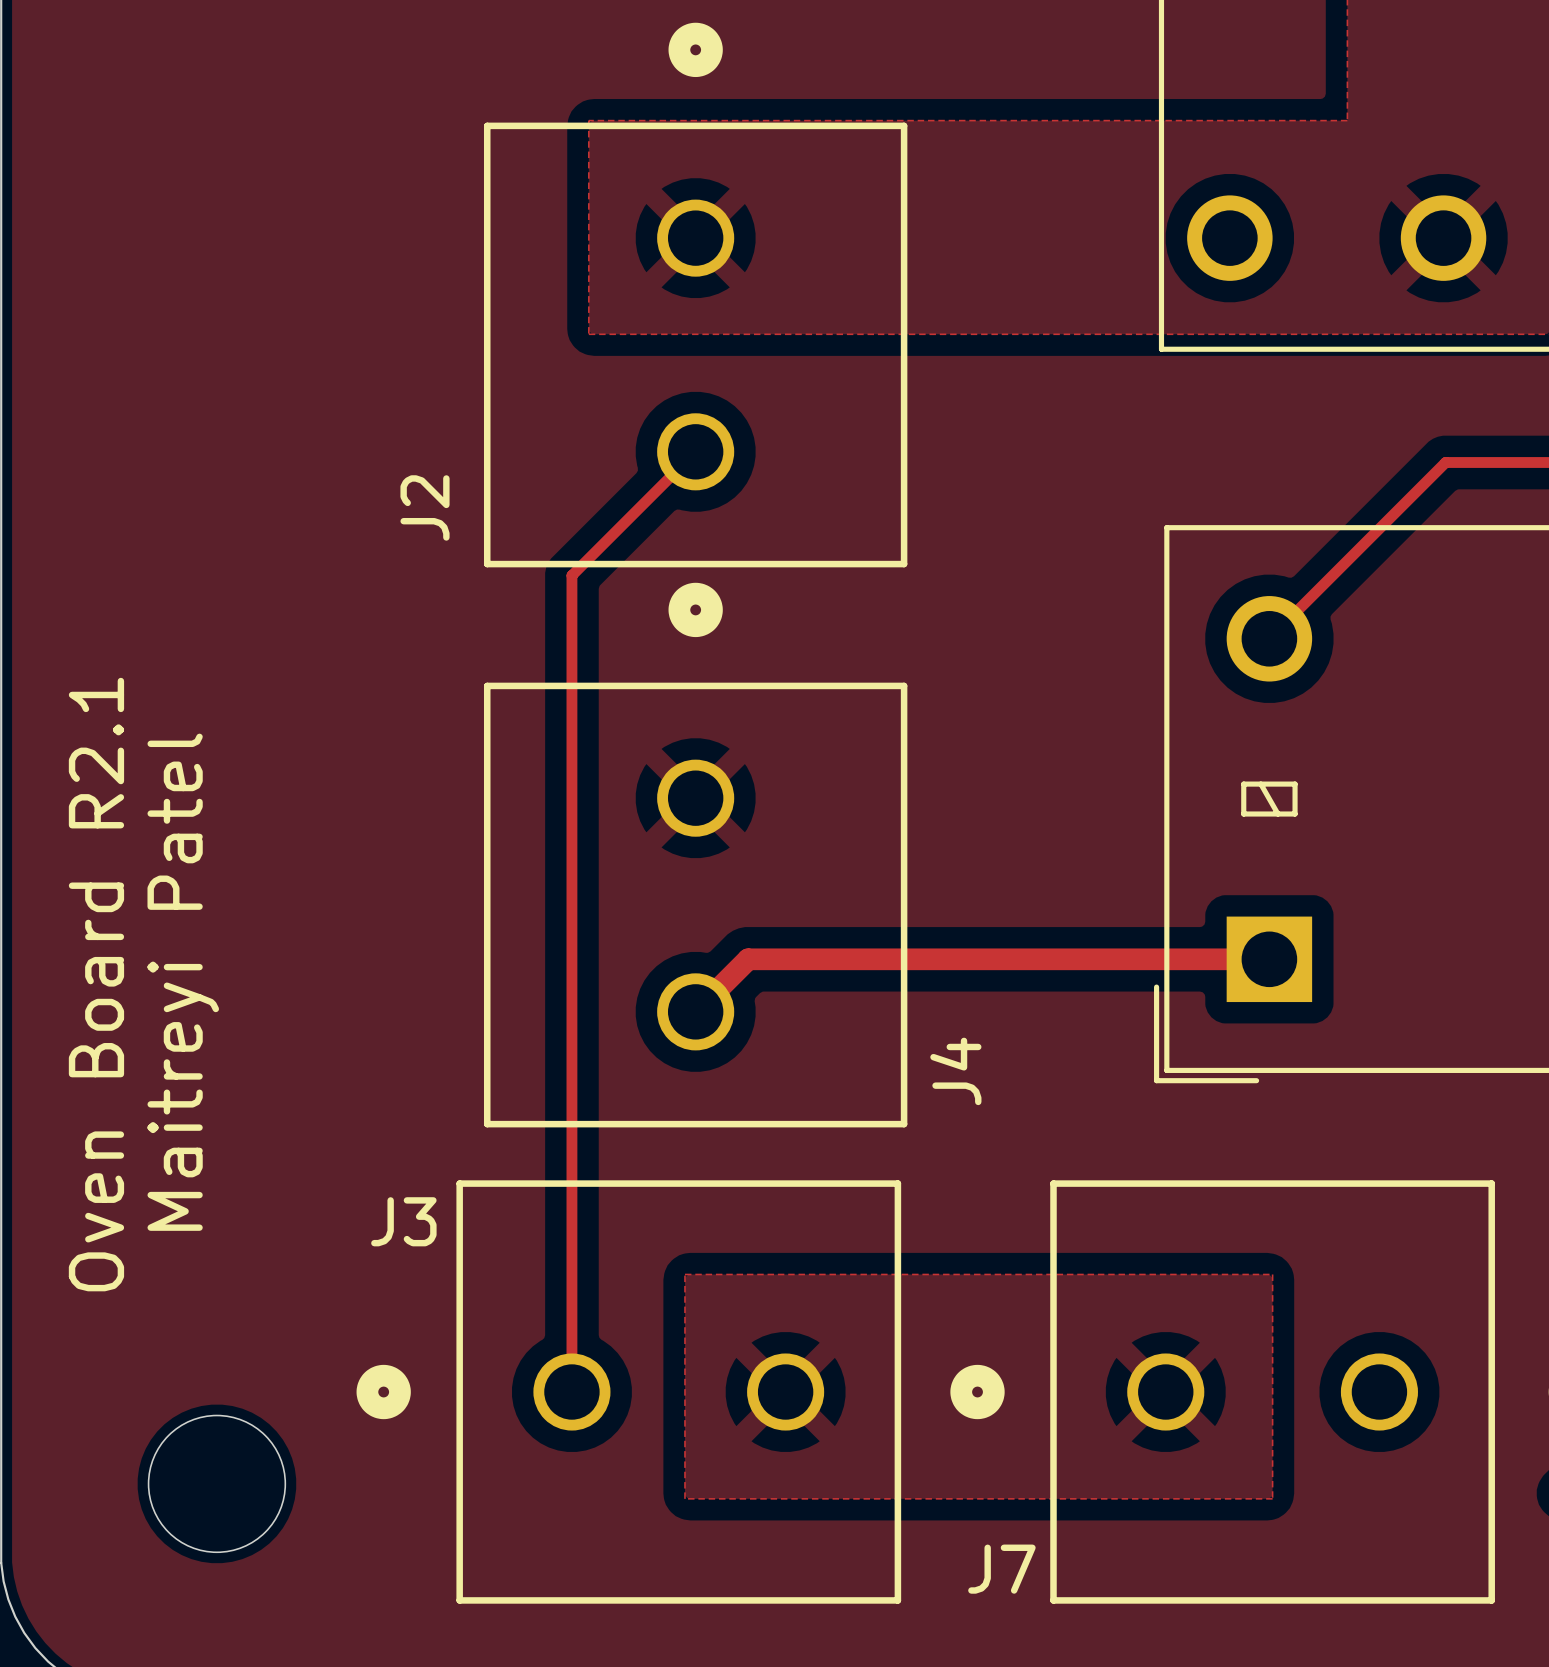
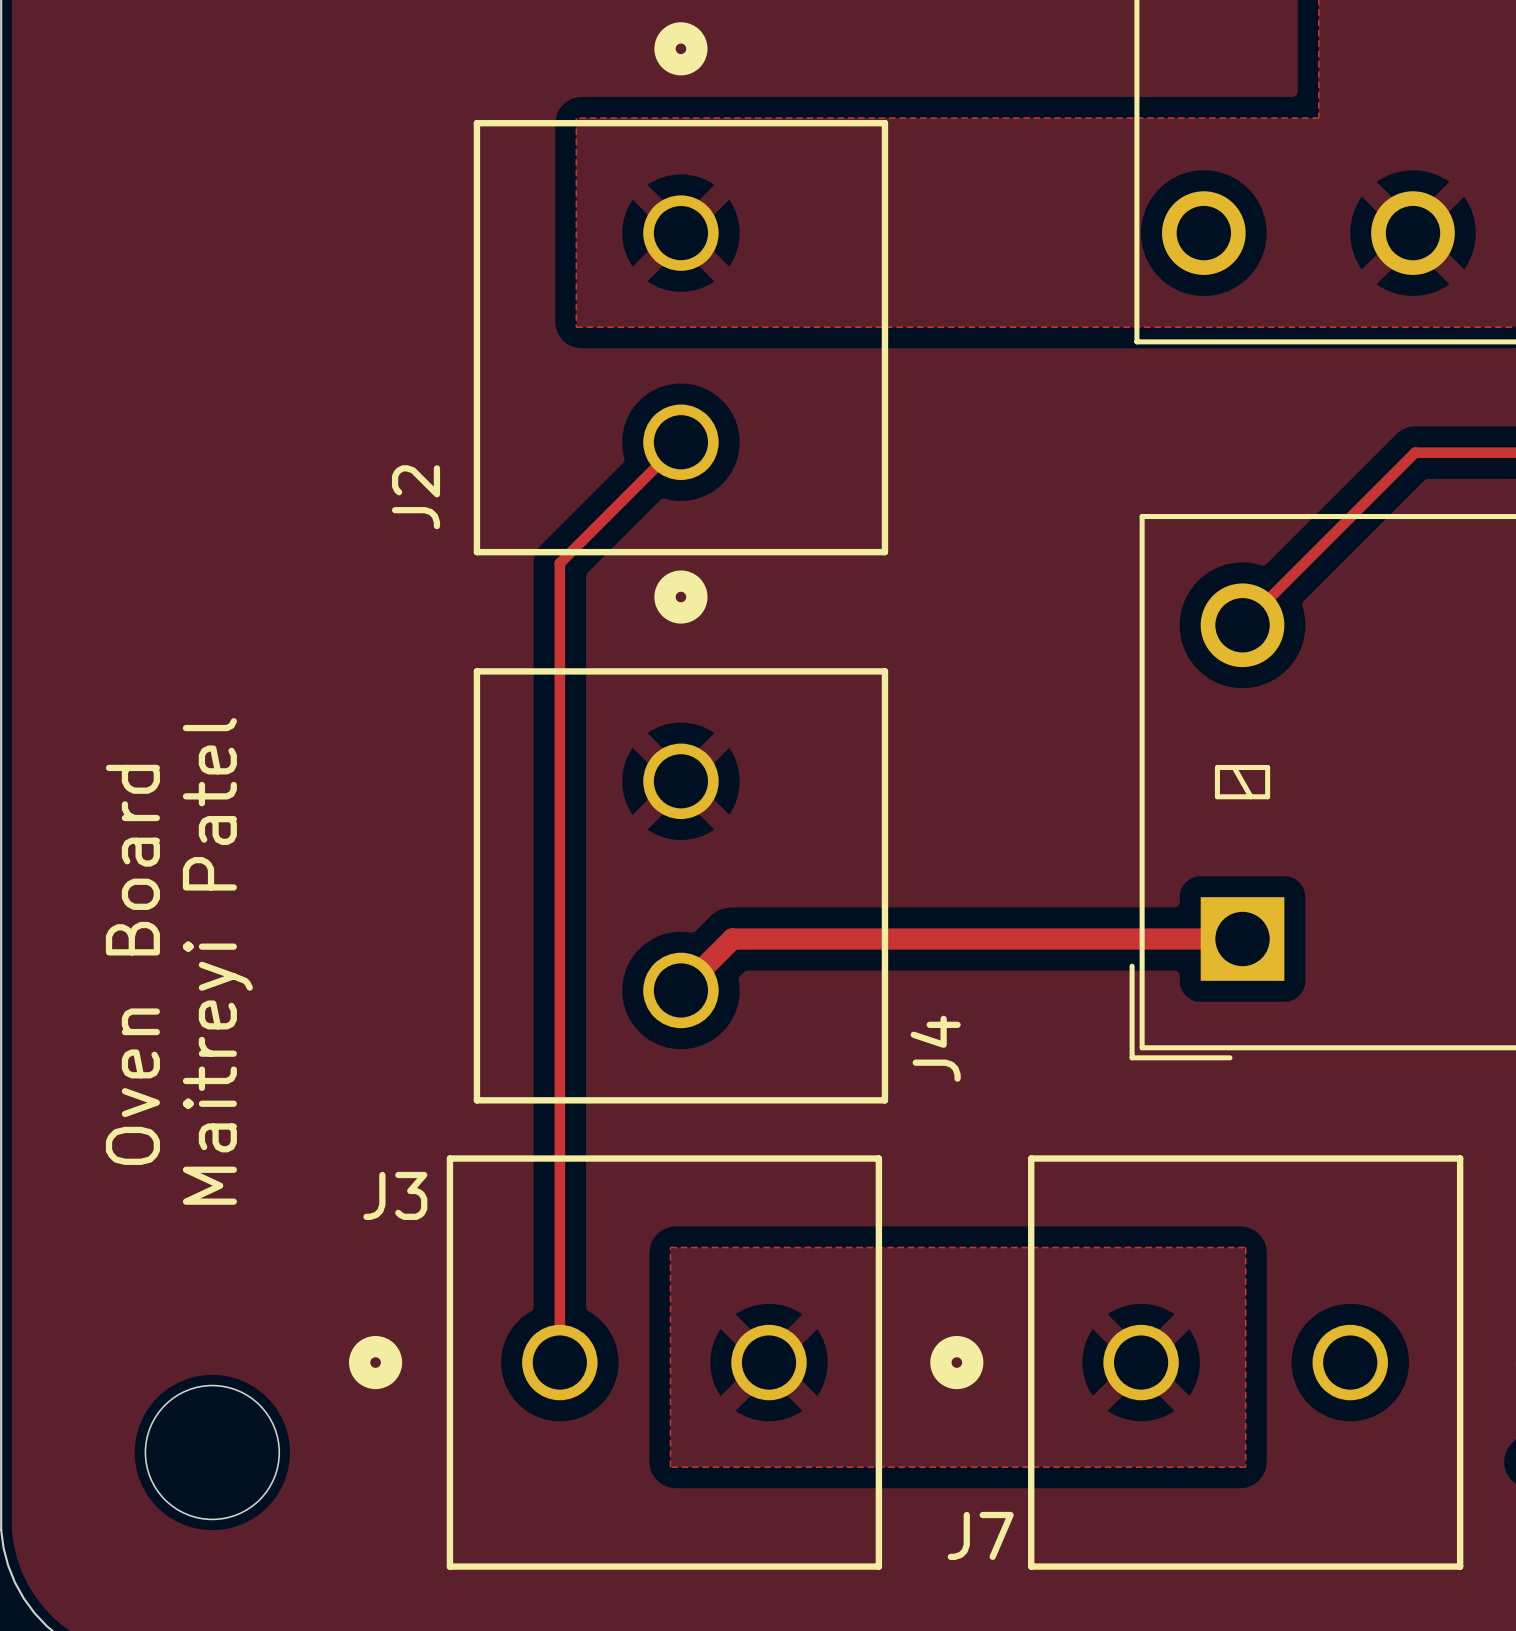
text position: Maitreyi Patel (183, 982) -> Maitreyi Patel (217, 961)
text: Oven Board R2.1 (96, 984) -> Oven Board (132, 964)

